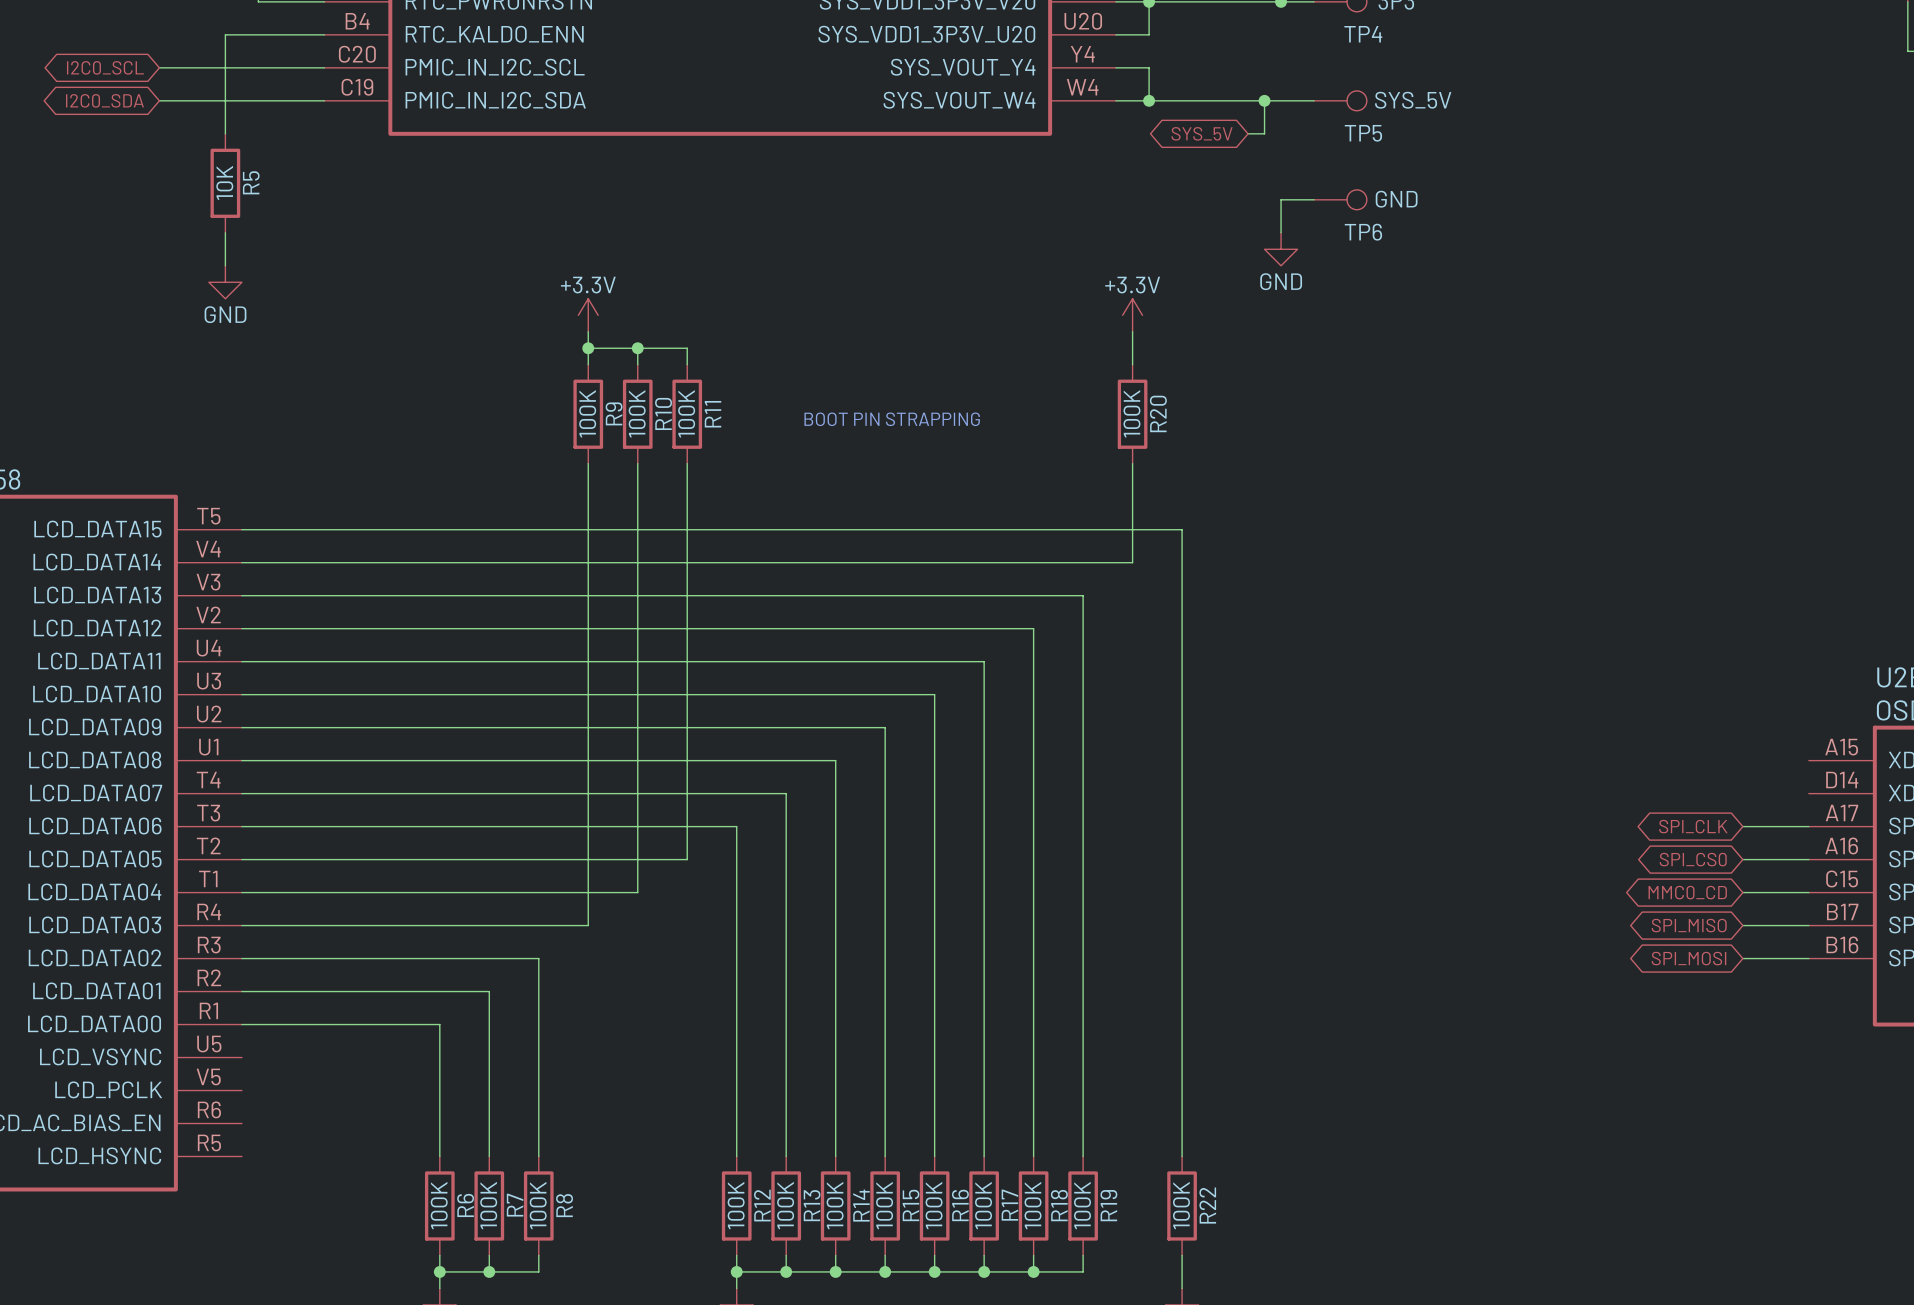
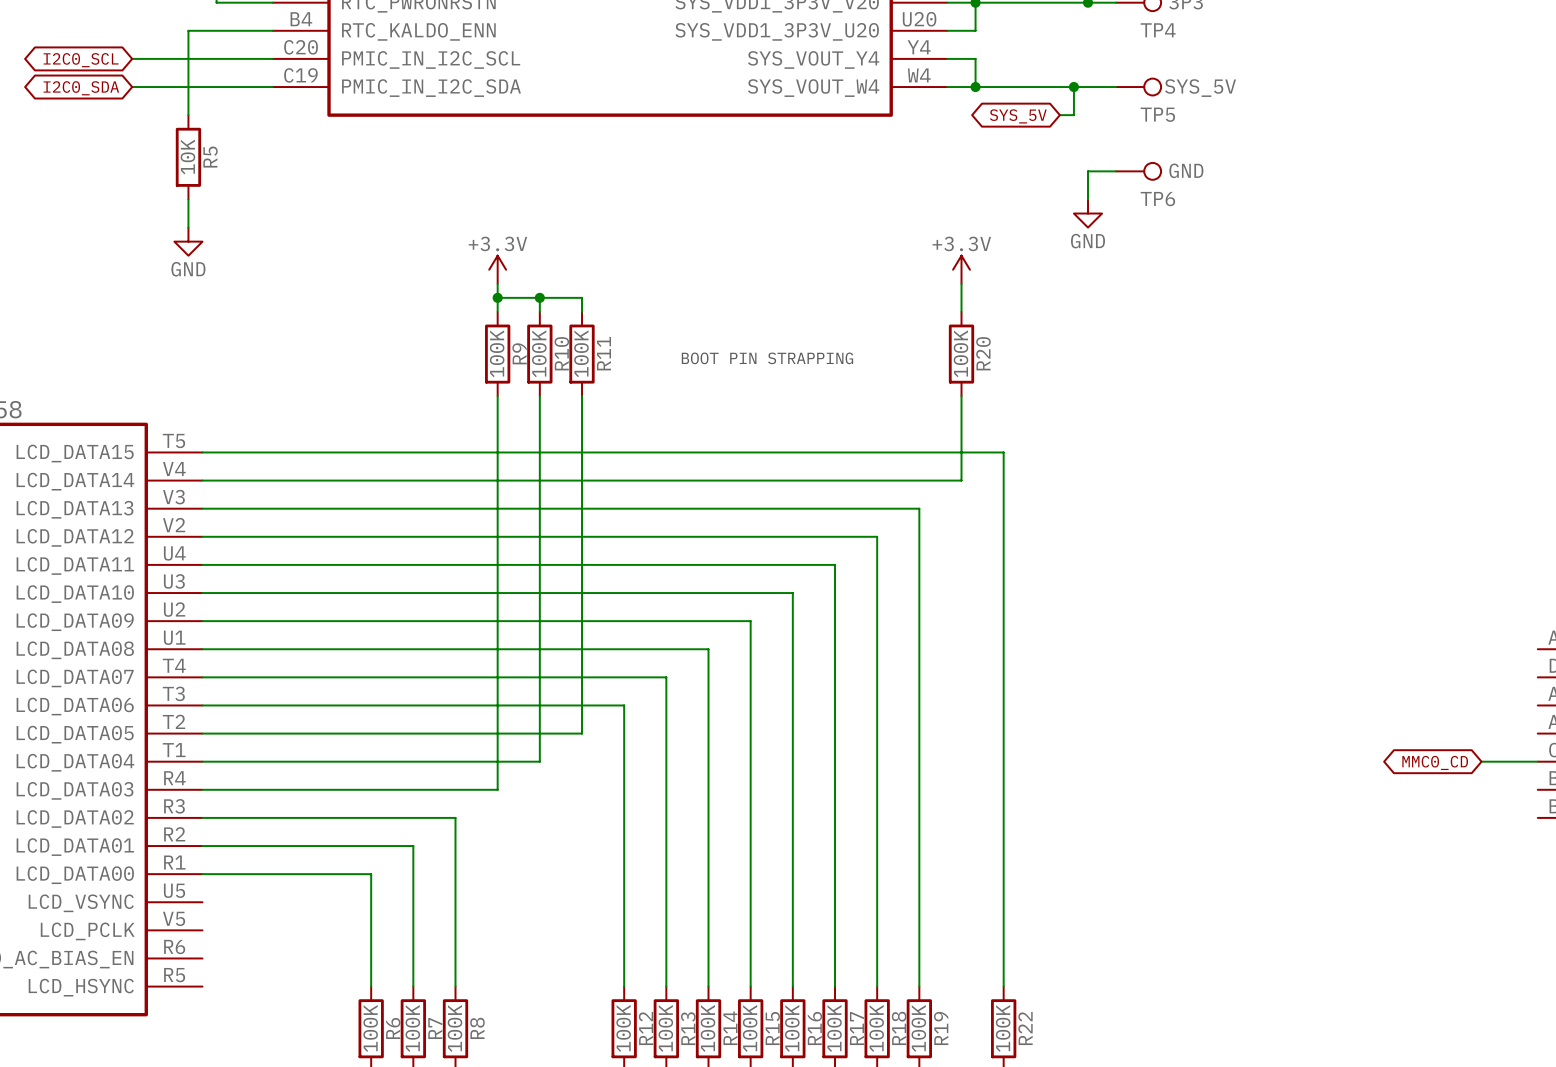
global label: SPI_CLK (1693, 826) -> none
wire: (1742, 826) (1808, 826) -> none
global label: SPI_CS0 (1693, 859) -> none
wire: (1742, 859) (1808, 859) -> none
global label: SPI_MISO (1689, 925) -> none
wire: (1742, 925) (1808, 925) -> none
global label: SPI_MOSI (1689, 958) -> none
wire: (1742, 958) (1808, 958) -> none

